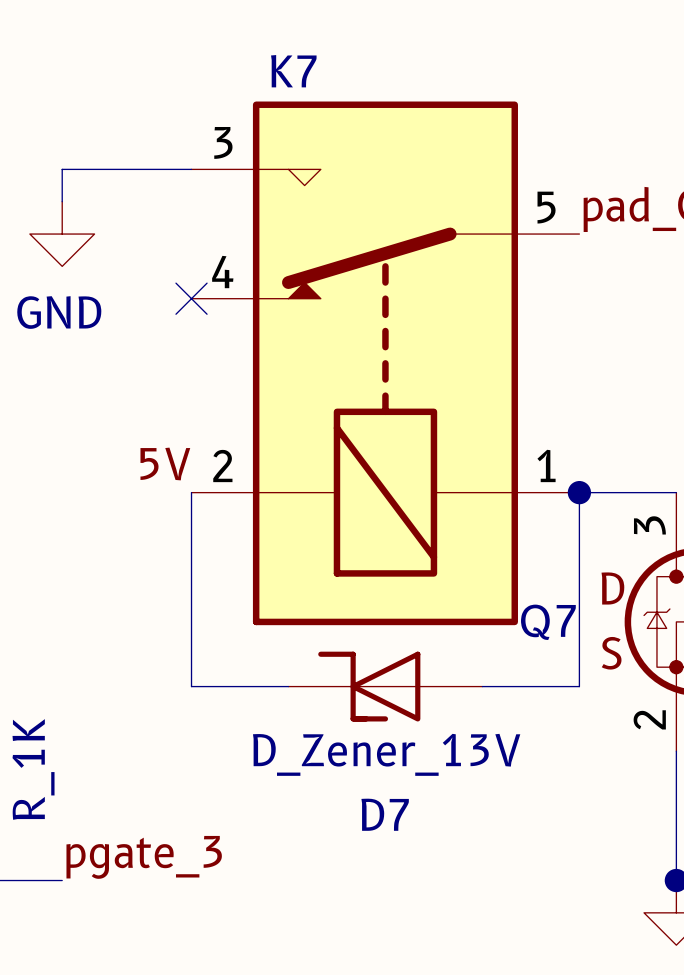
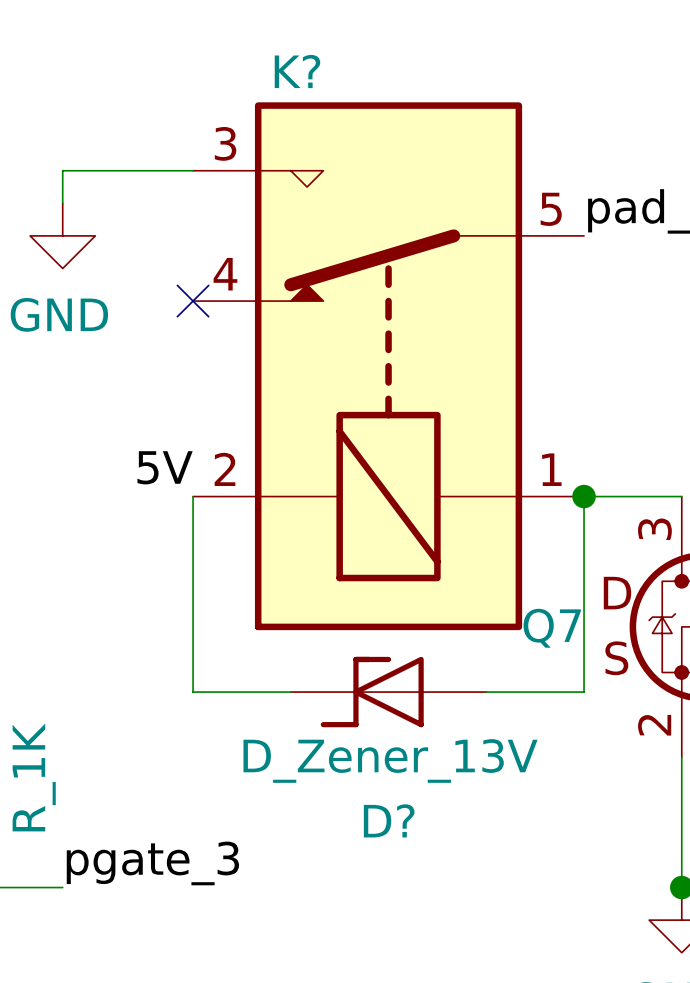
K7 name: K7 (293, 71) -> K? (297, 71)
D7: D_Zener_13V (385, 686) -> none
D?: none -> D_Zener_13V (388, 692)

